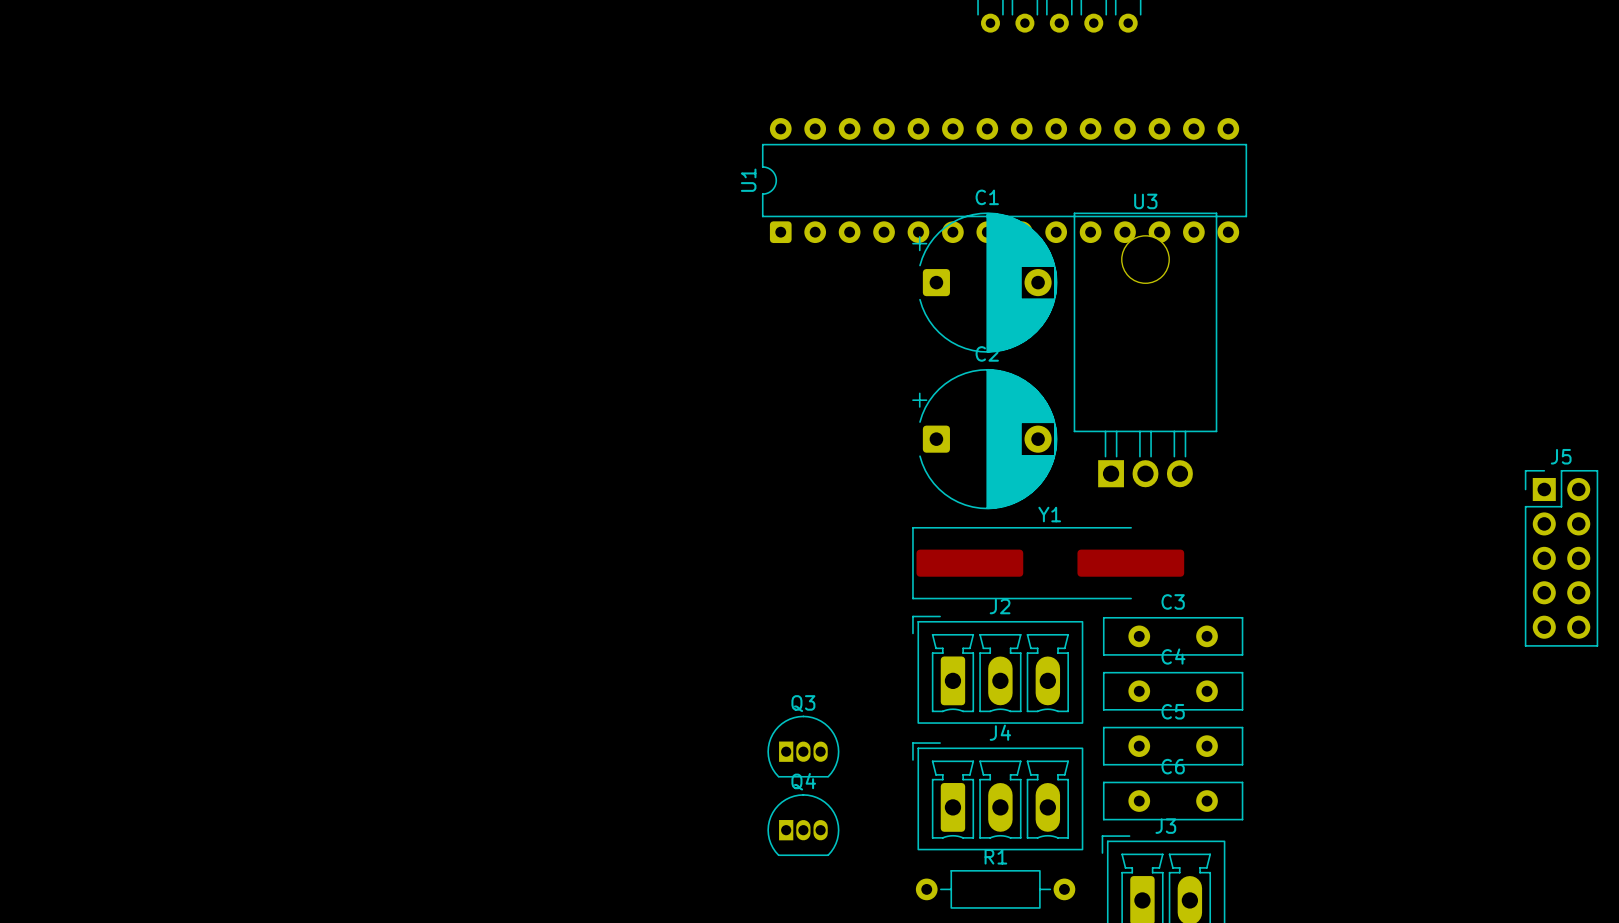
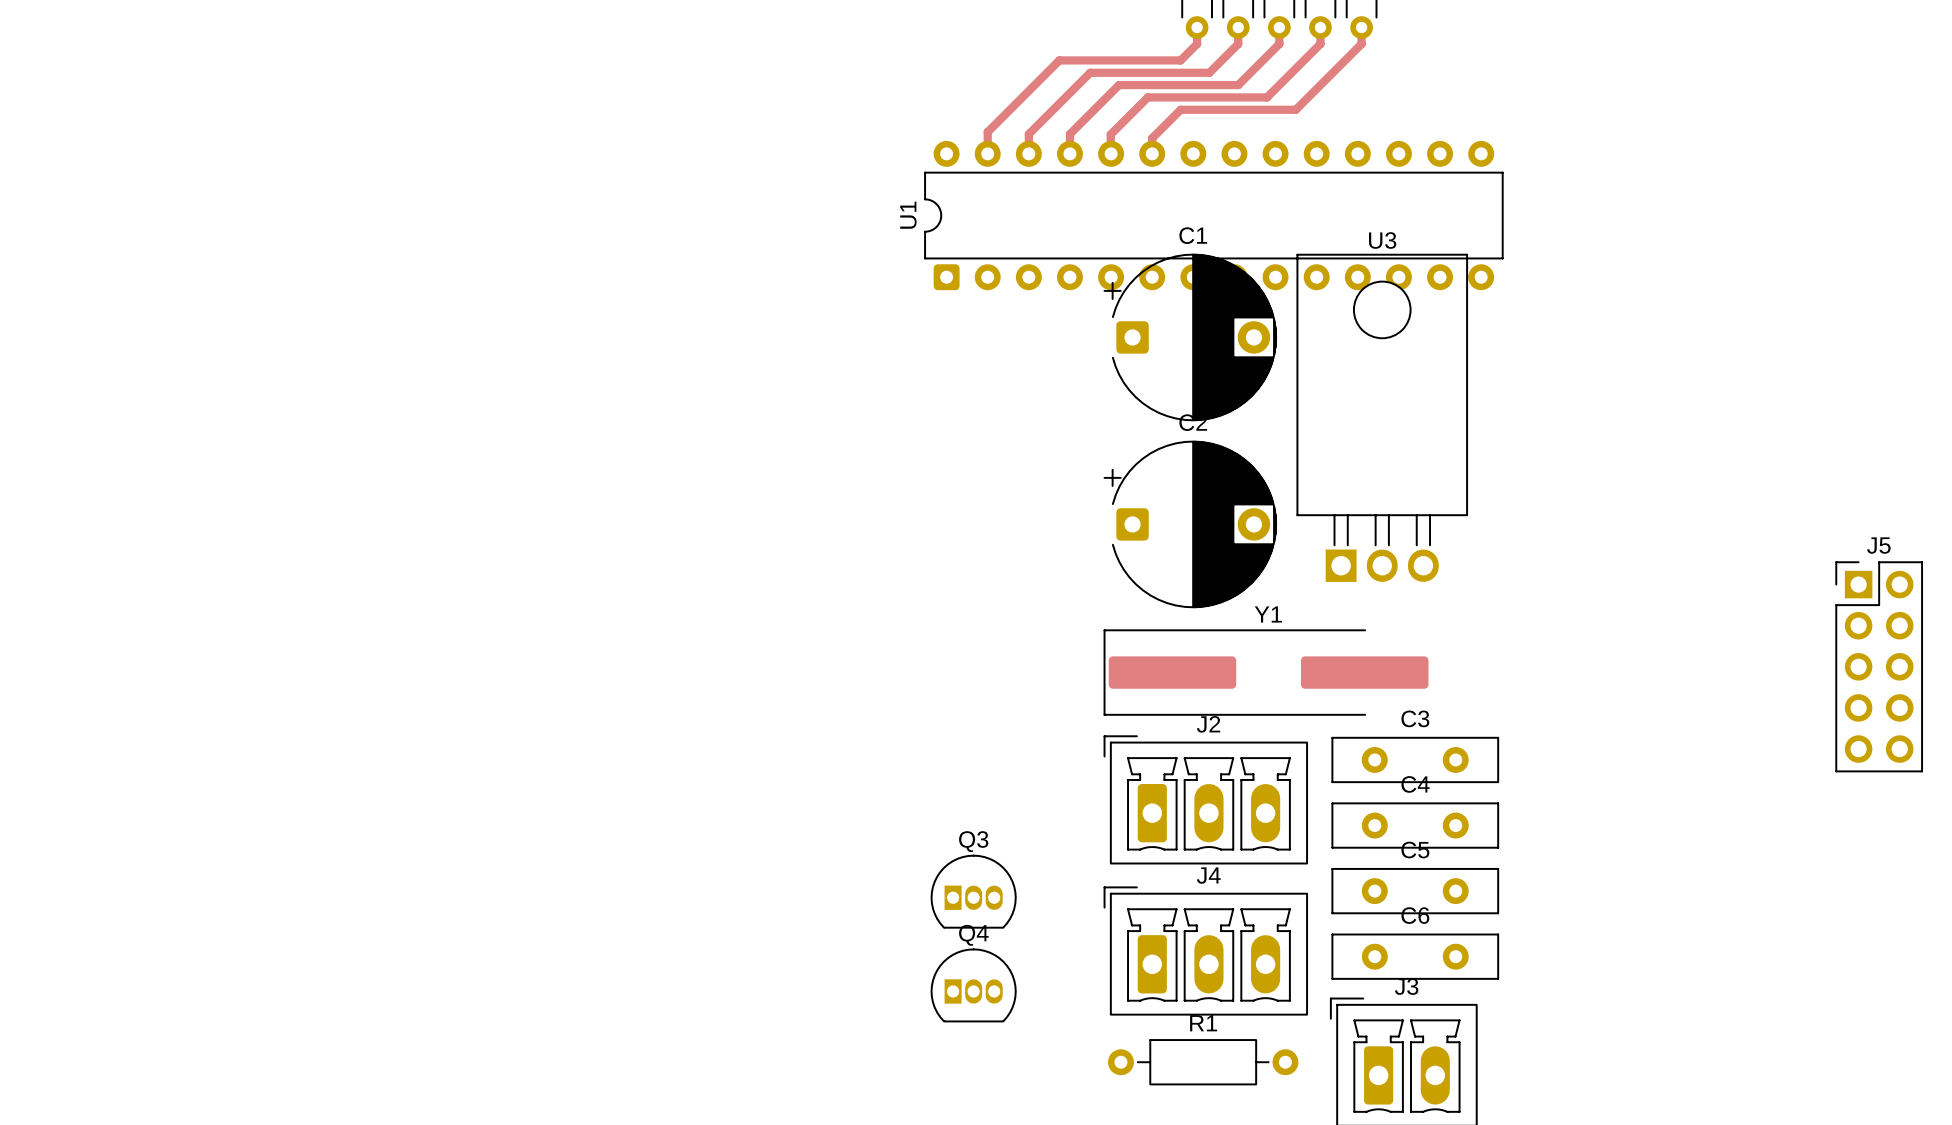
top track: none -> (1197, 27) (1197, 43) (1180, 60) (1059, 60) (987, 132) (987, 153)
top track: none -> (1238, 27) (1238, 43) (1209, 72) (1090, 72) (1028, 134) (1028, 153)
top track: none -> (1279, 27) (1279, 43) (1238, 85) (1118, 85) (1069, 134) (1069, 153)
top track: none -> (1320, 27) (1320, 43) (1267, 97) (1147, 97) (1110, 134) (1111, 153)
top track: none -> (1361, 27) (1361, 43) (1295, 109) (1180, 109) (1152, 138) (1152, 153)

